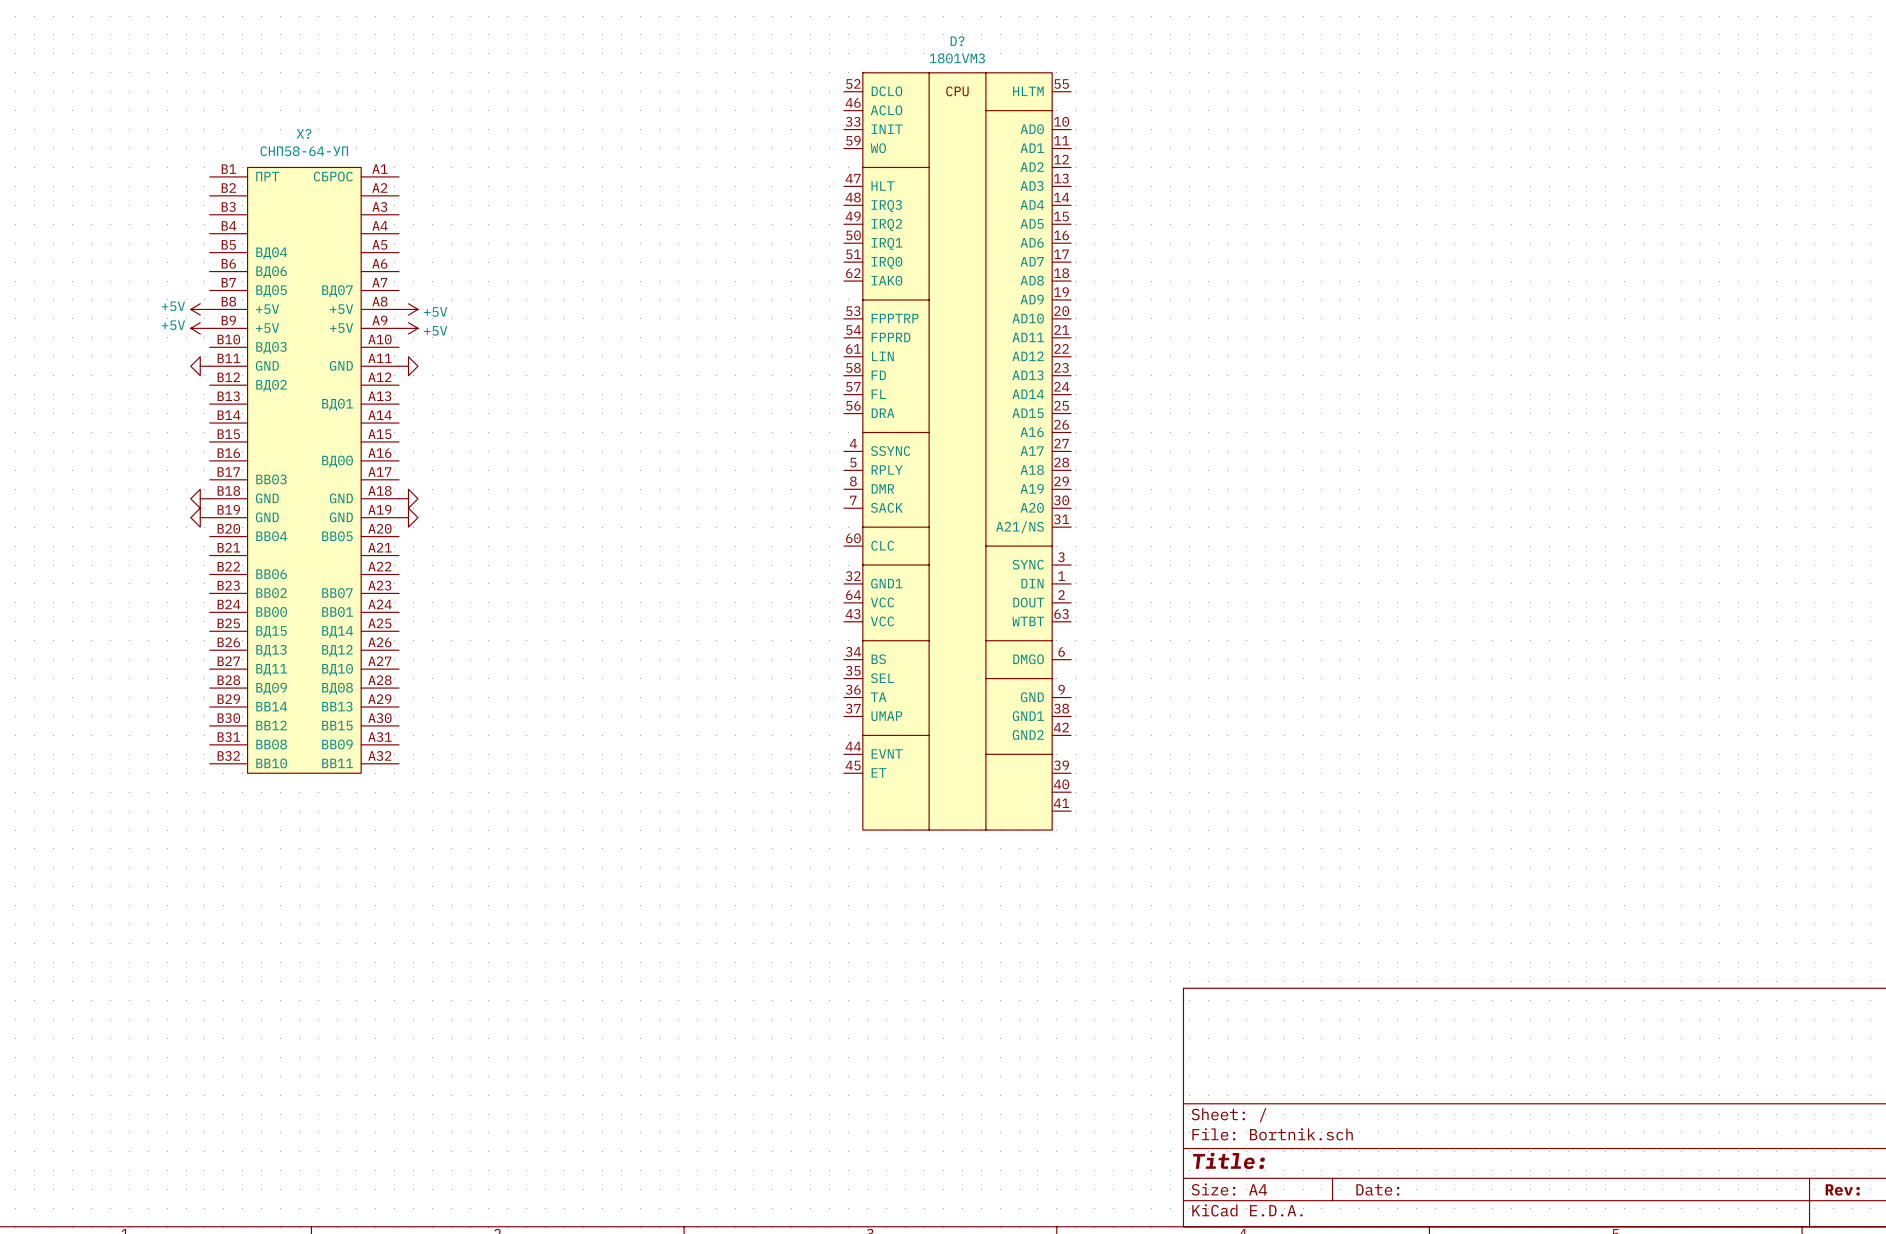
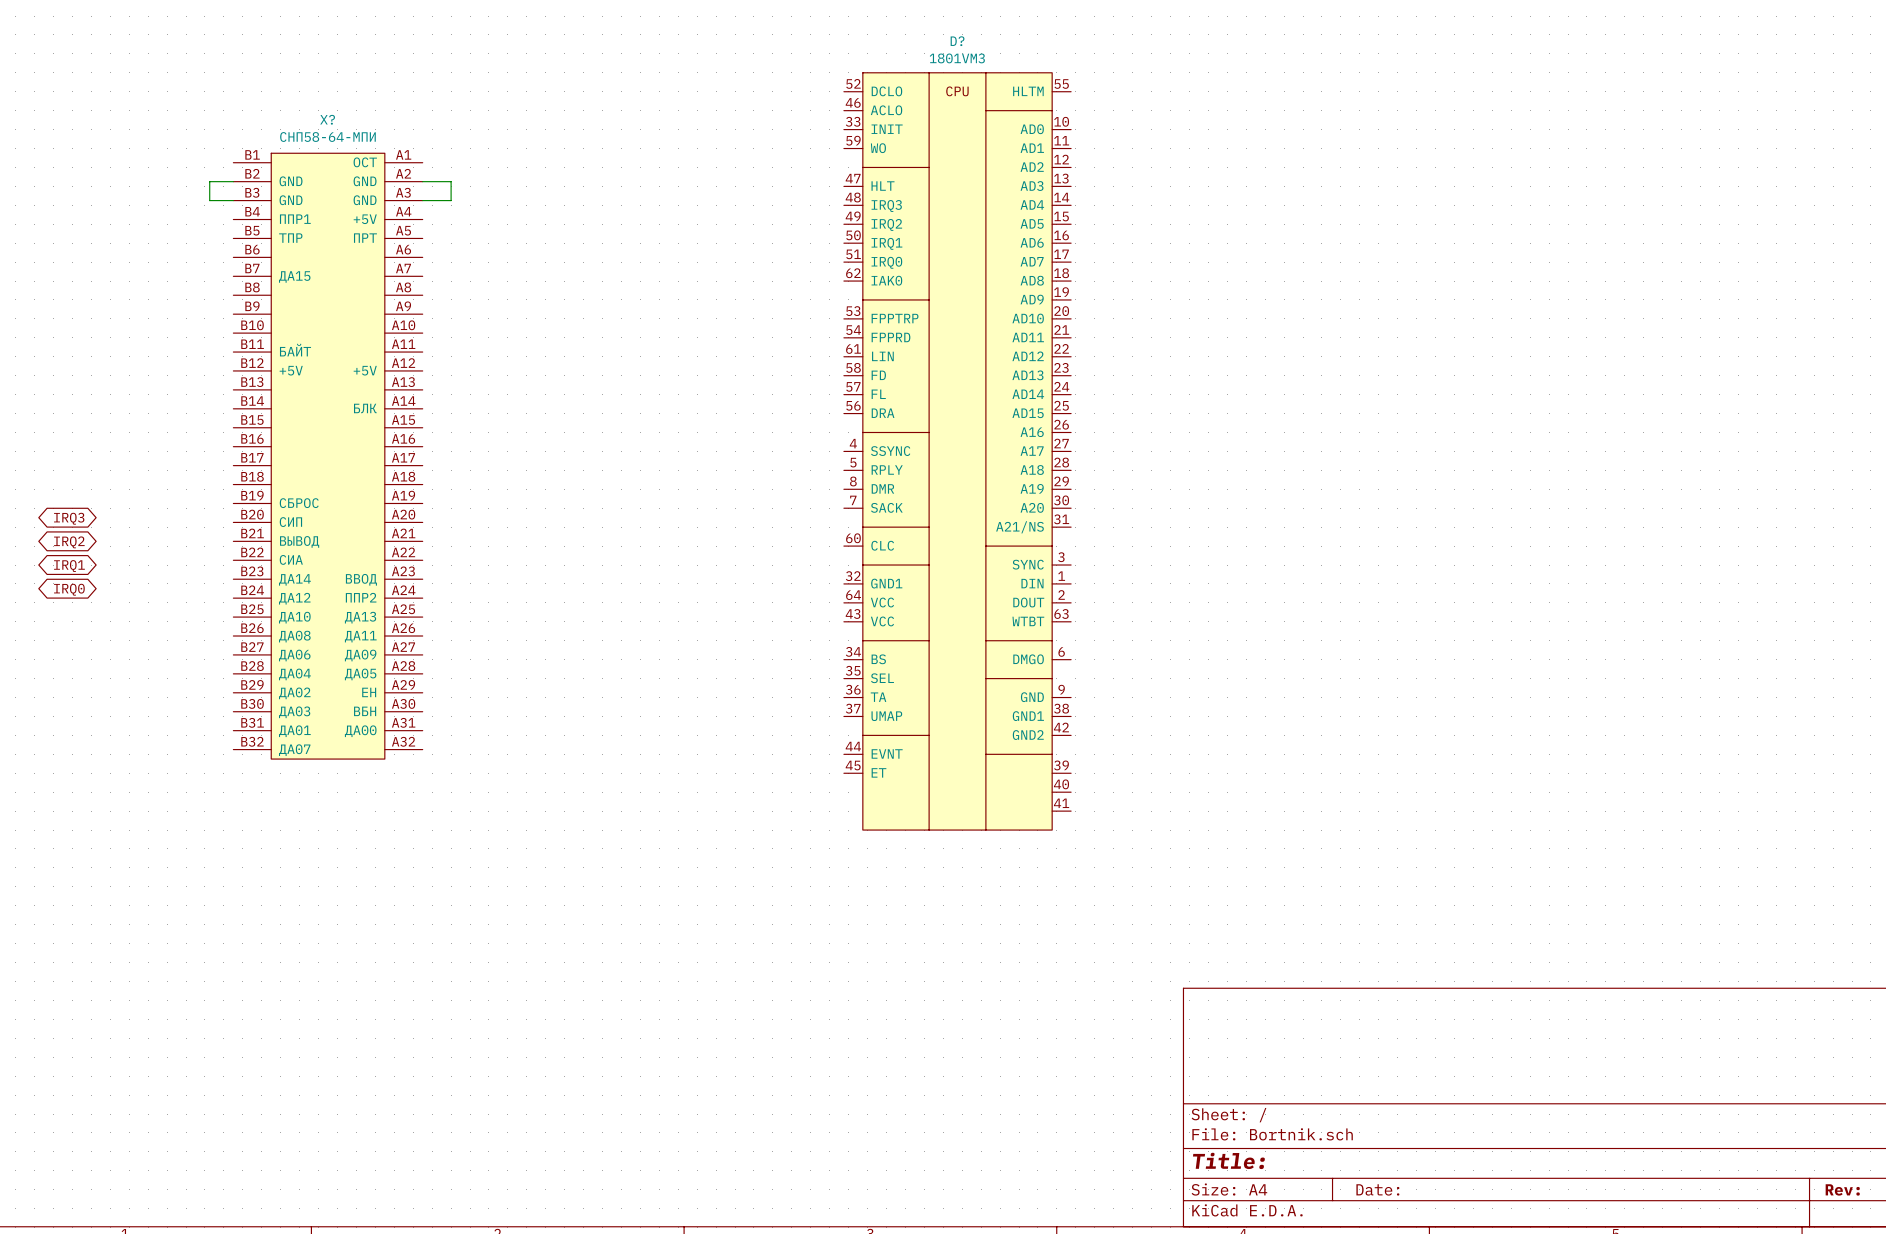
wire: none -> (233, 181) (209, 181) (209, 200) (233, 200)
wire: none -> (422, 181) (451, 181) (451, 200) (422, 200)
power symbol: +5V (200, 309) -> none
power symbol: +5V (408, 309) -> none
power symbol: +5V (200, 328) -> none
power symbol: +5V (408, 328) -> none
power symbol: (200, 366) -> none
power symbol: (408, 366) -> none
X?: none -> СНП58-64-МПИ (328, 456)
X?: СНП58-64-УП (304, 470) -> none
power symbol: (200, 498) -> none
power symbol: (408, 498) -> none
power symbol: (200, 517) -> none
power symbol: (408, 517) -> none
global label: none -> IRQ3 (69, 518)
global label: none -> IRQ2 (69, 542)
global label: none -> IRQ1 (69, 566)
global label: none -> IRQ0 (69, 589)

